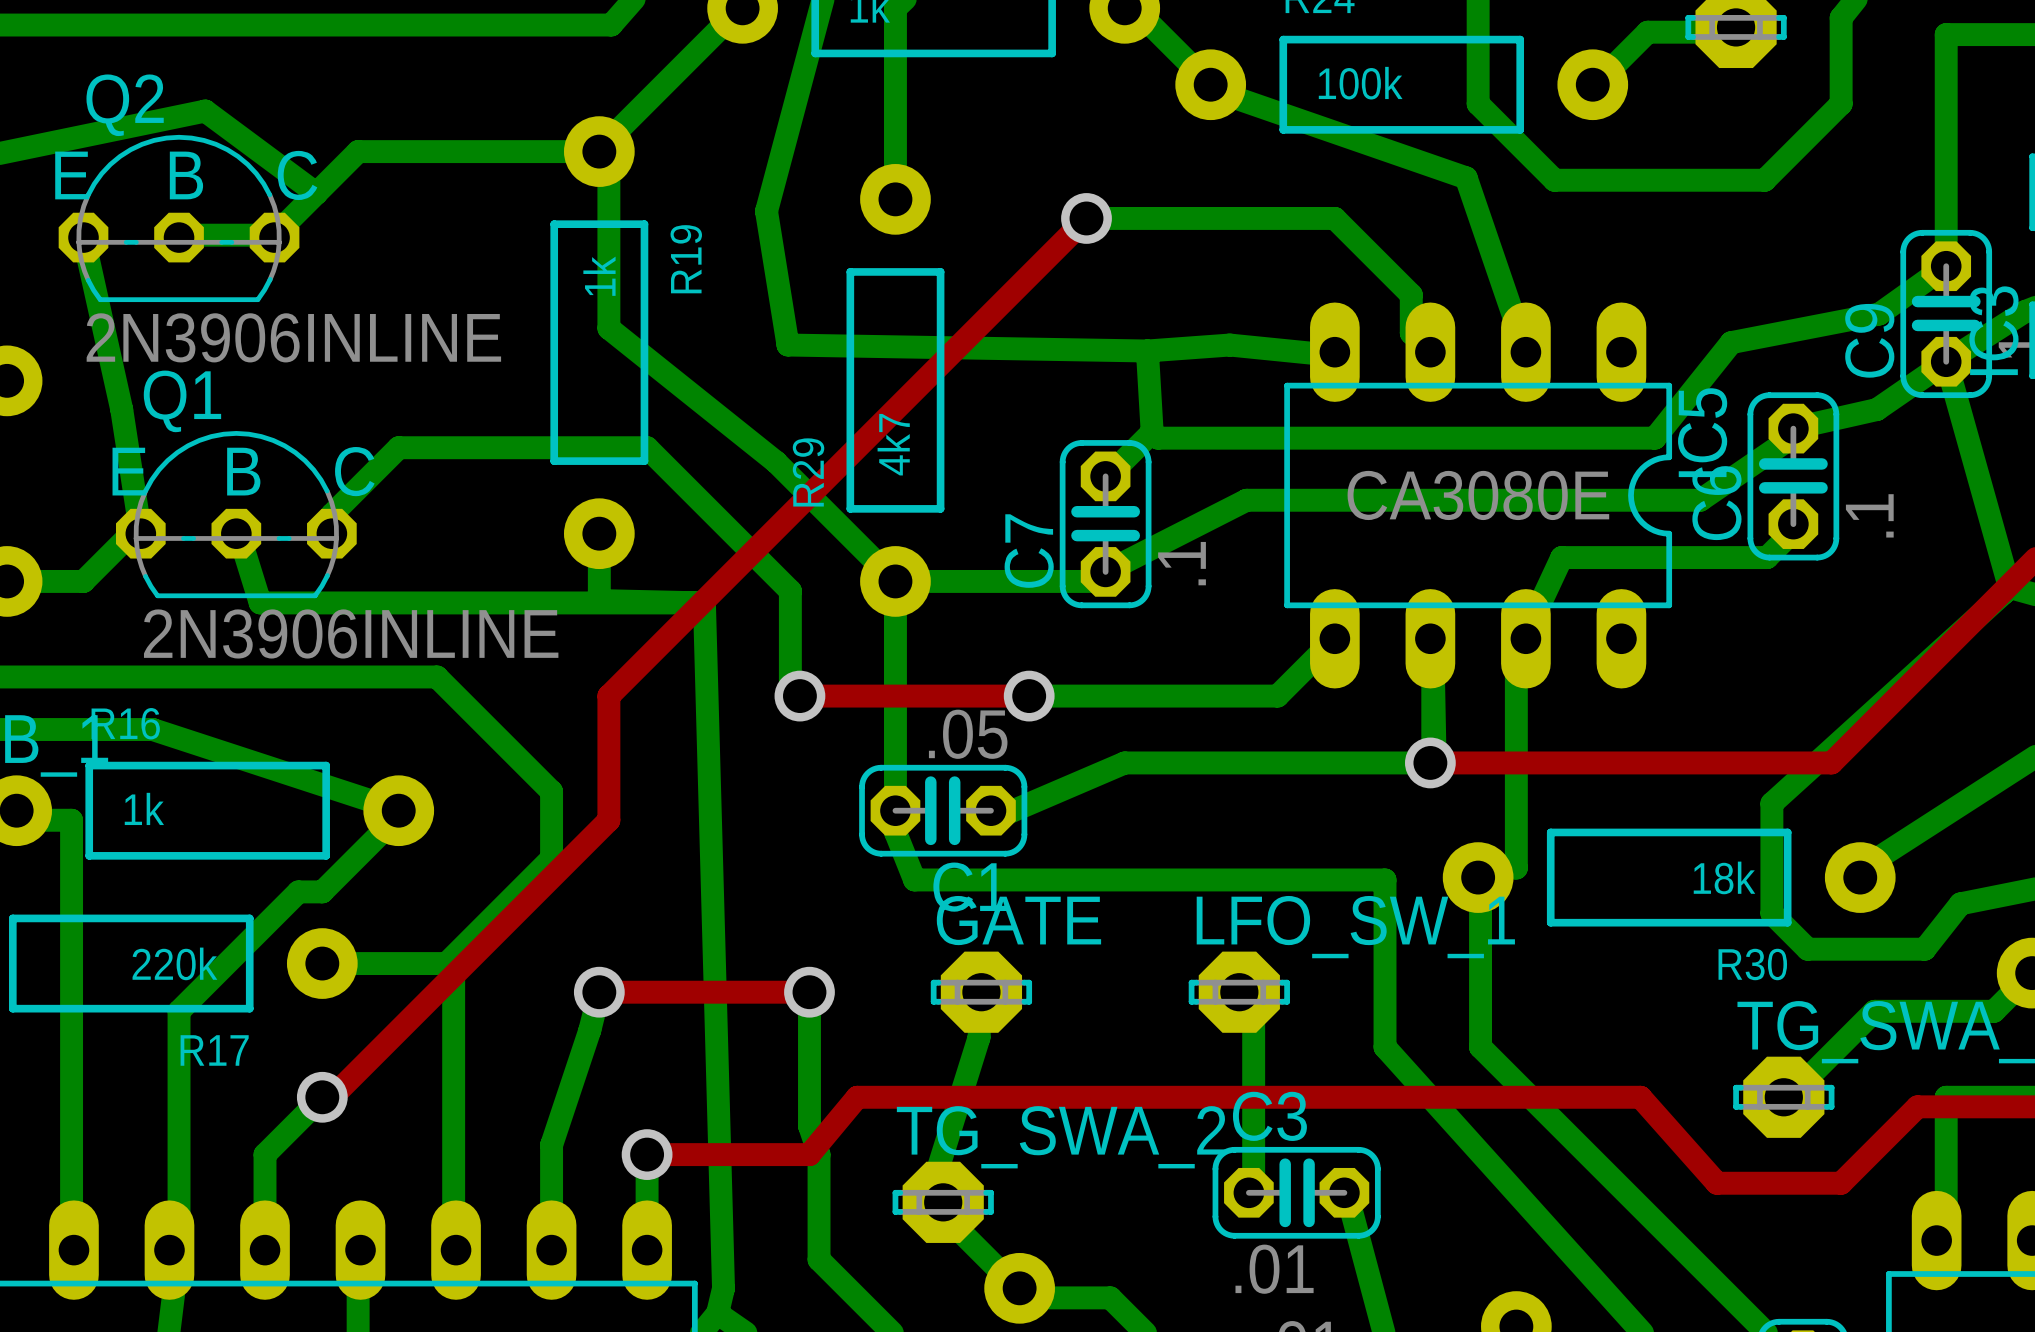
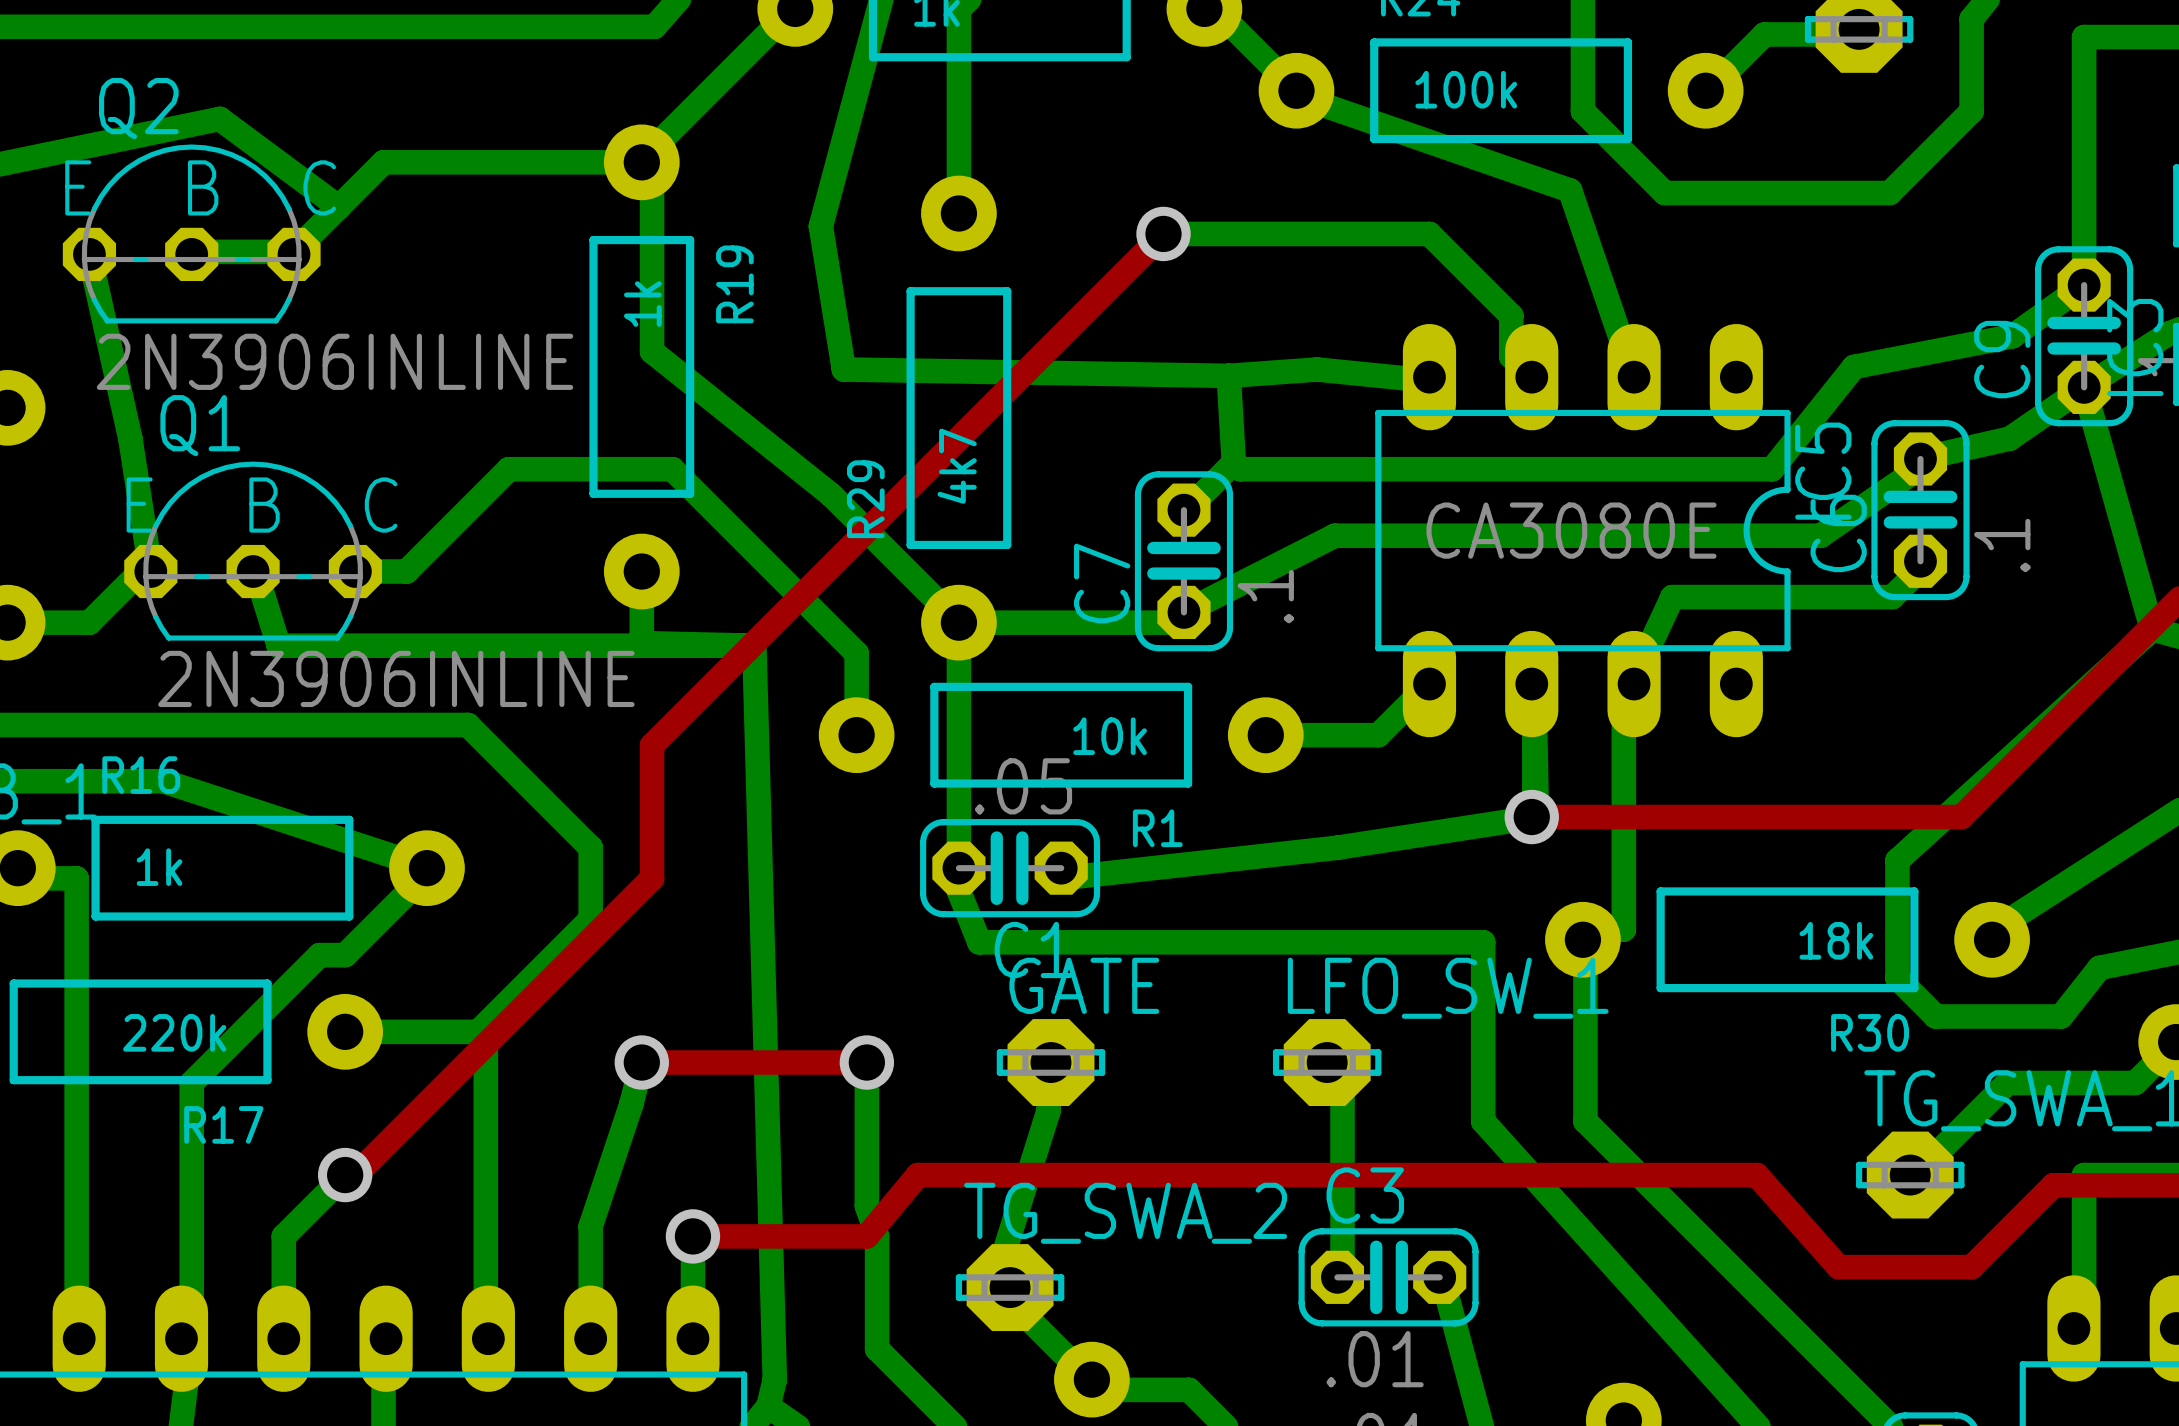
bottom track: (331, 533) (331, 514) (398, 447) (647, 447) (790, 591) (790, 686) (799, 696) -> (355, 571) (406, 571) (508, 469) (672, 469) (856, 653) (856, 735)
R1: none -> 10k (1061, 735)
bottom track: (1287, 686) (1277, 696) (1029, 696) -> (1378, 735) (1265, 735)
top track: (799, 696) (1029, 696) -> none
via: (799, 696) -> none
via: (1029, 696) -> none
bottom track: (1435, 762) (1124, 762) (990, 820) -> (1536, 817) (1337, 847) (1061, 878)

